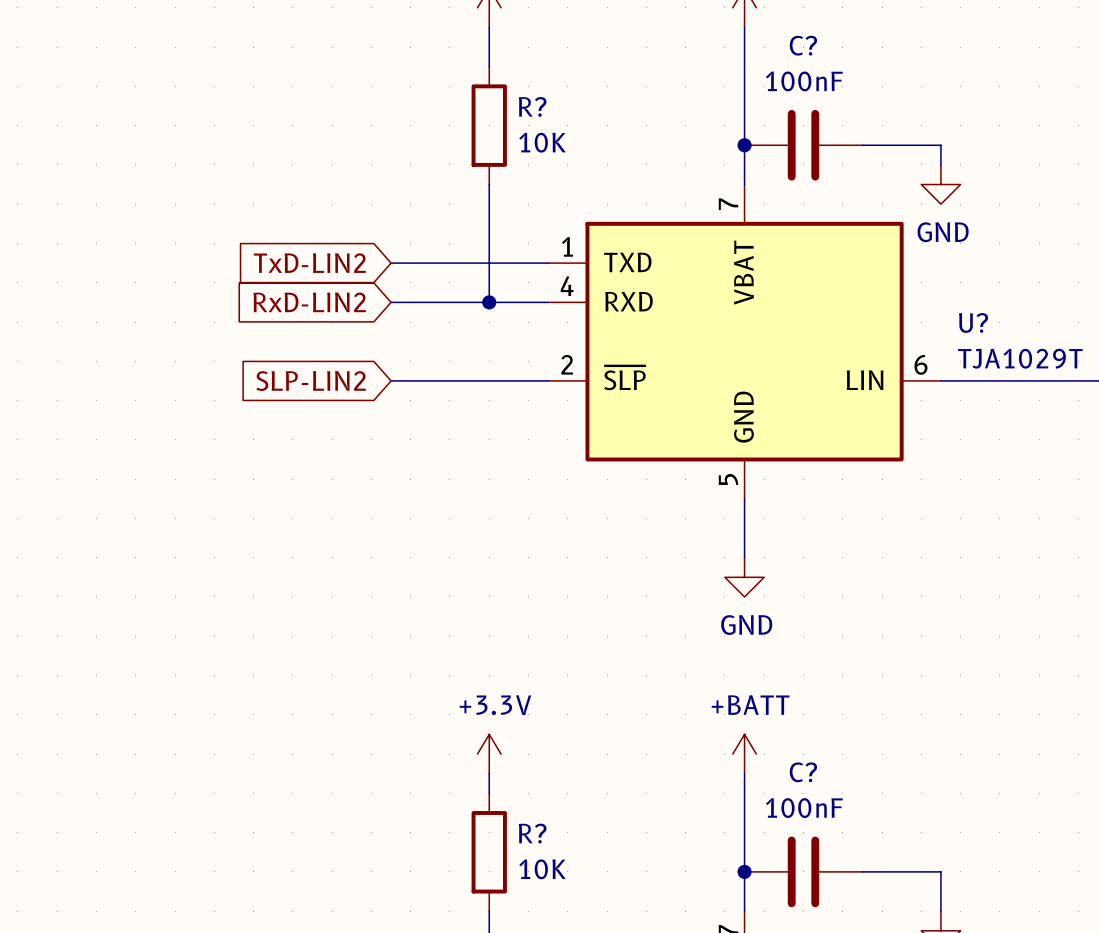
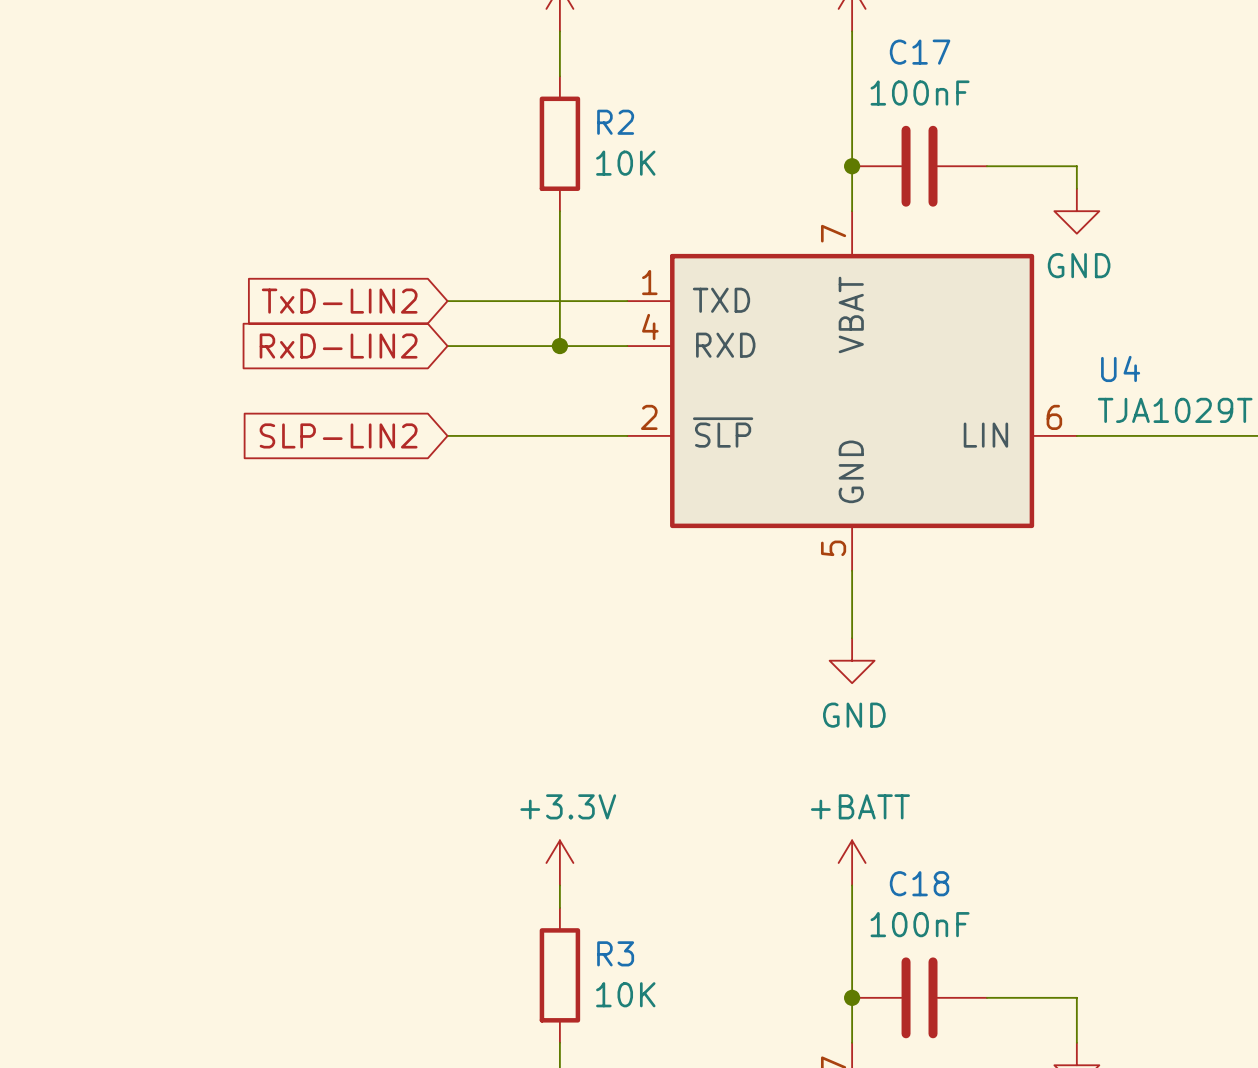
C? name: C? (803, 45) -> C17 (920, 52)
R? name: R? (532, 106) -> R2 (615, 122)
U? name: U? (973, 322) -> U4 (1120, 368)
C? name: C? (803, 772) -> C18 (919, 883)
R? name: R? (532, 833) -> R3 (615, 953)

